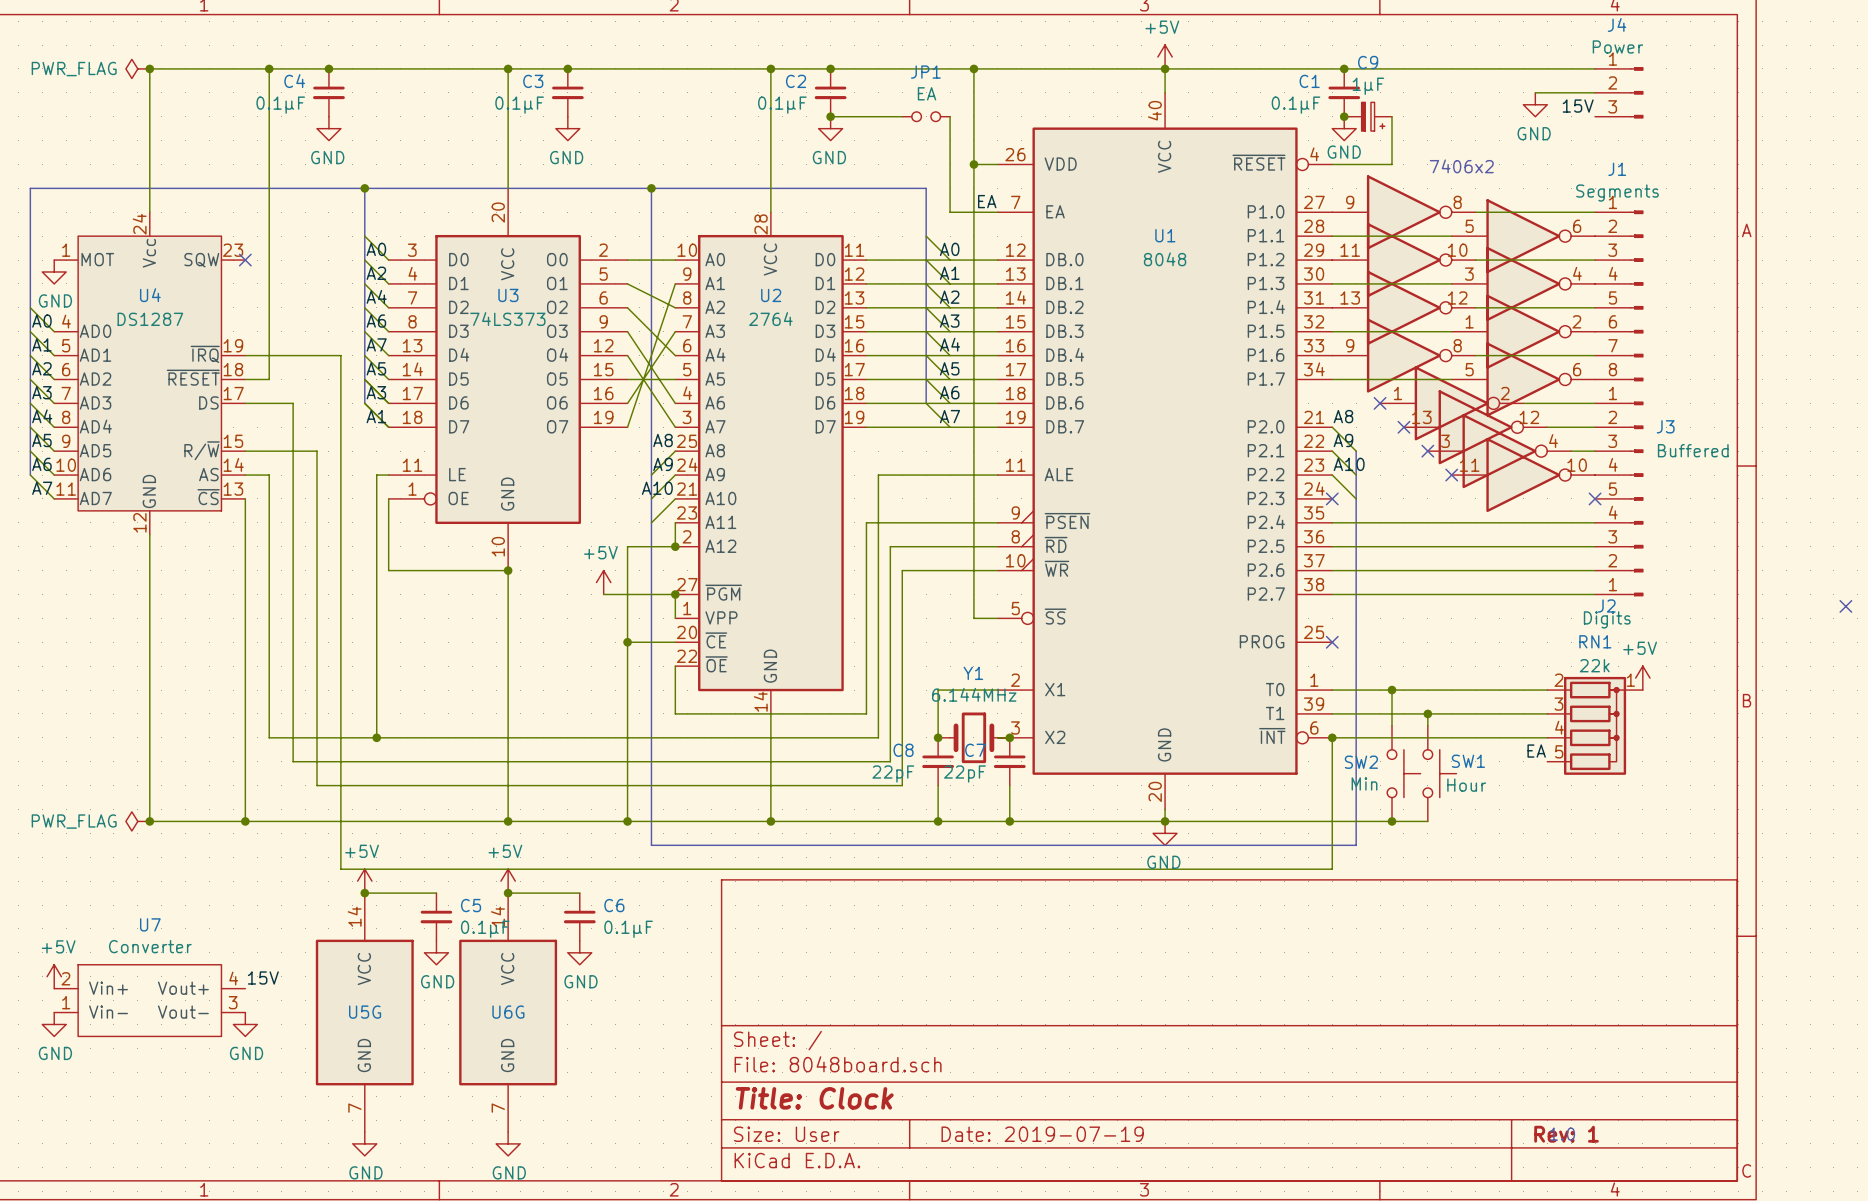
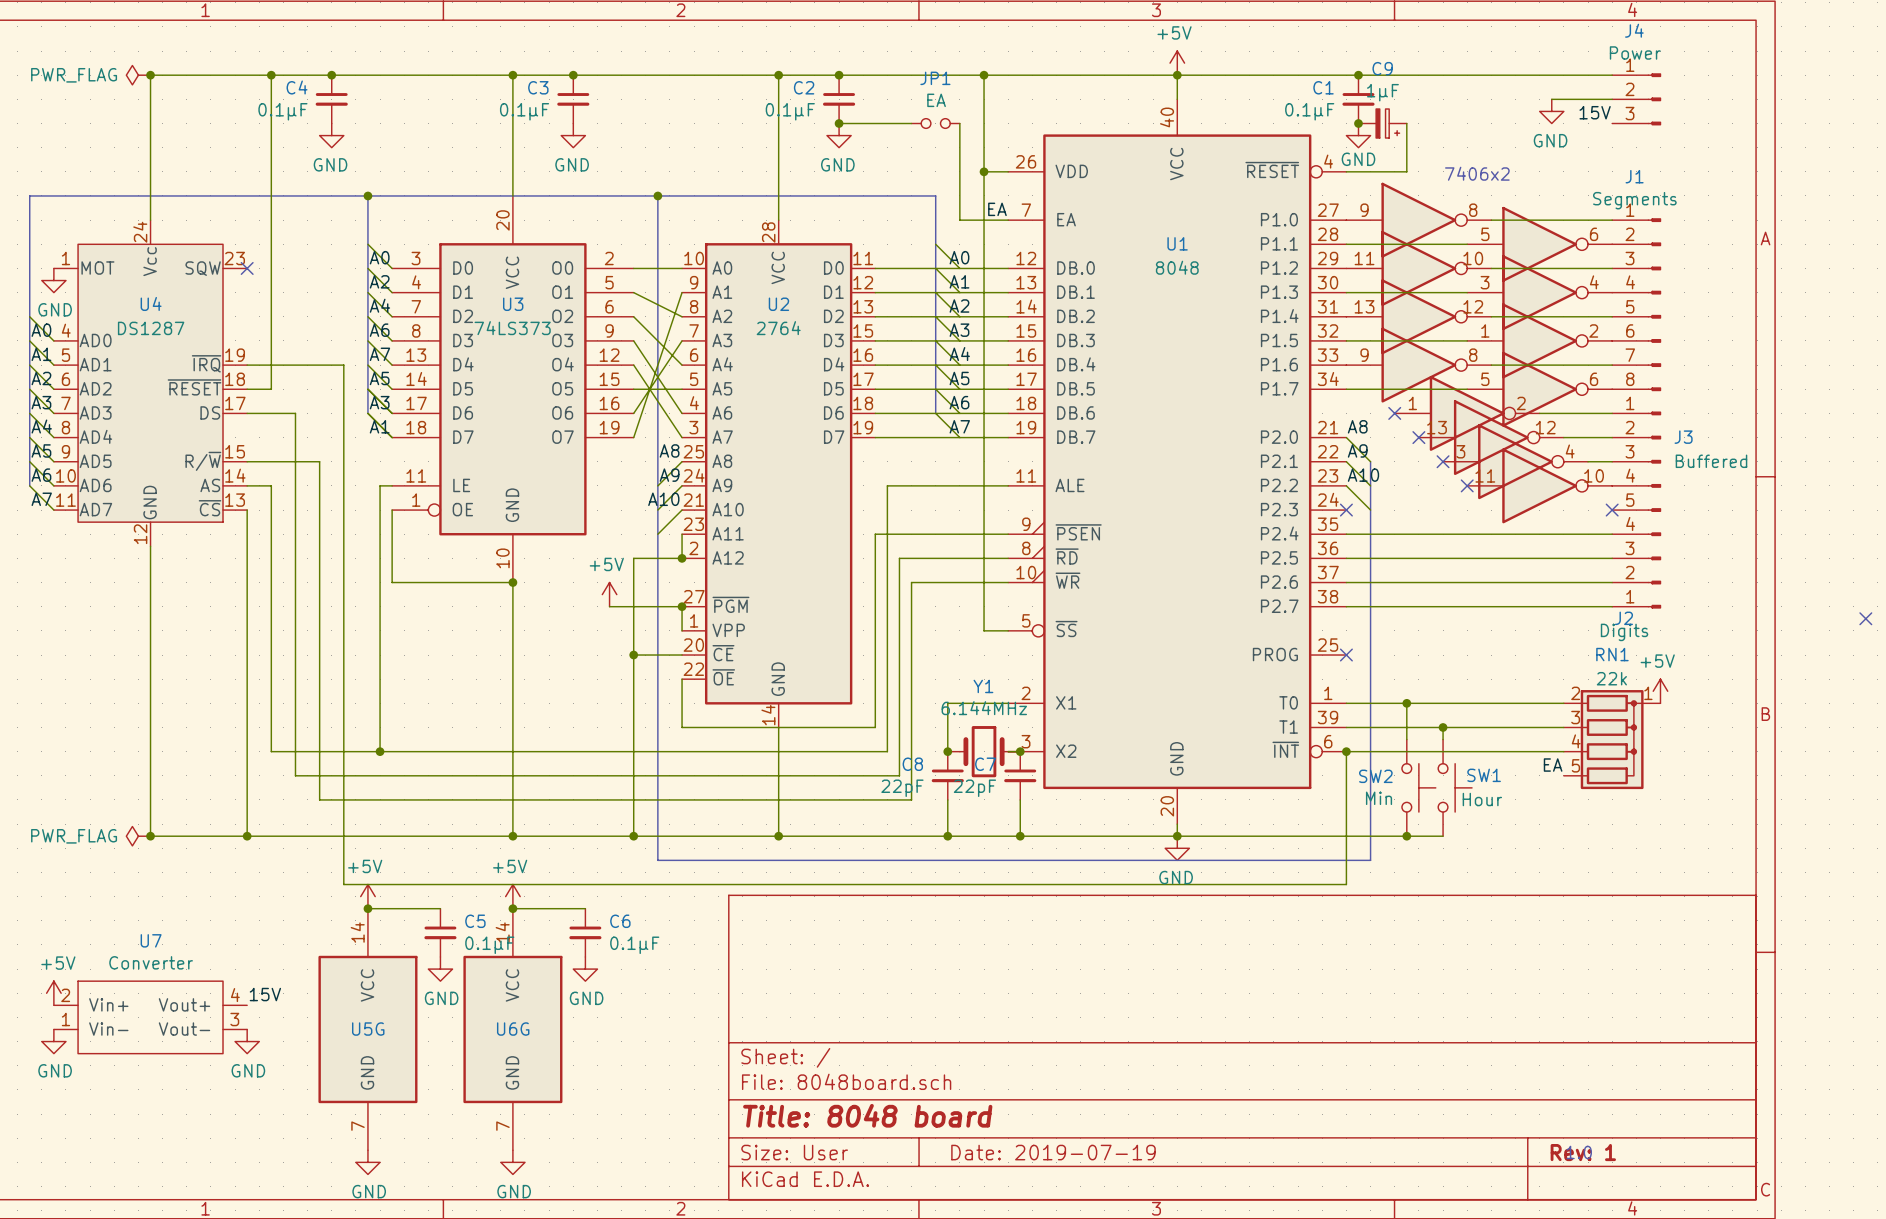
title block: Title: Clock (814, 1098) -> Title: 8048 board (867, 1115)

